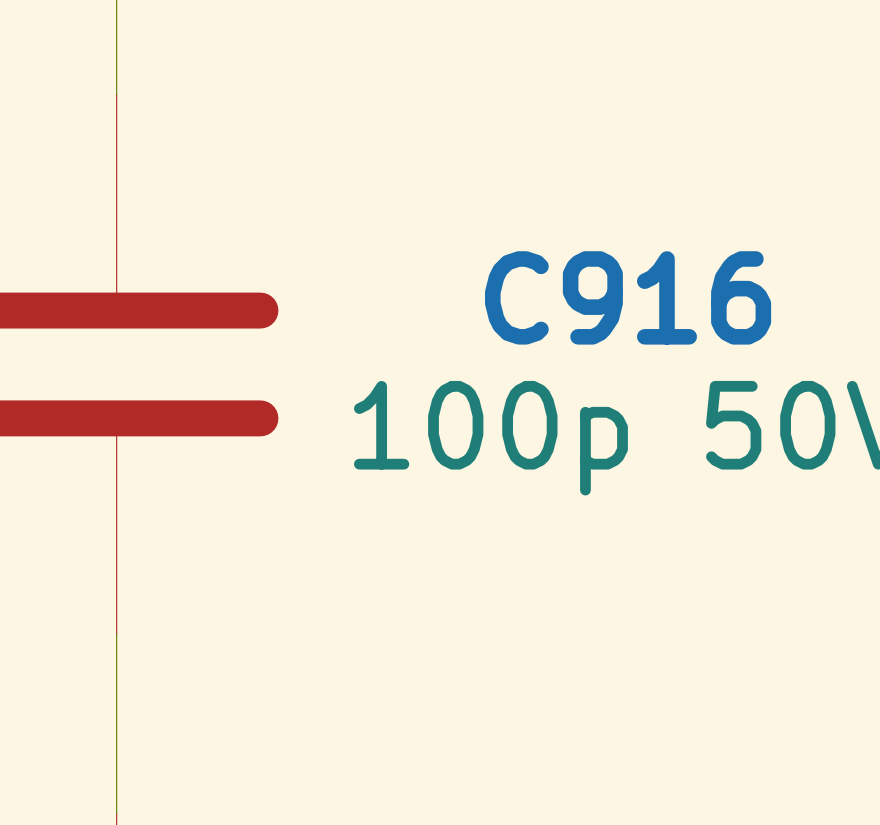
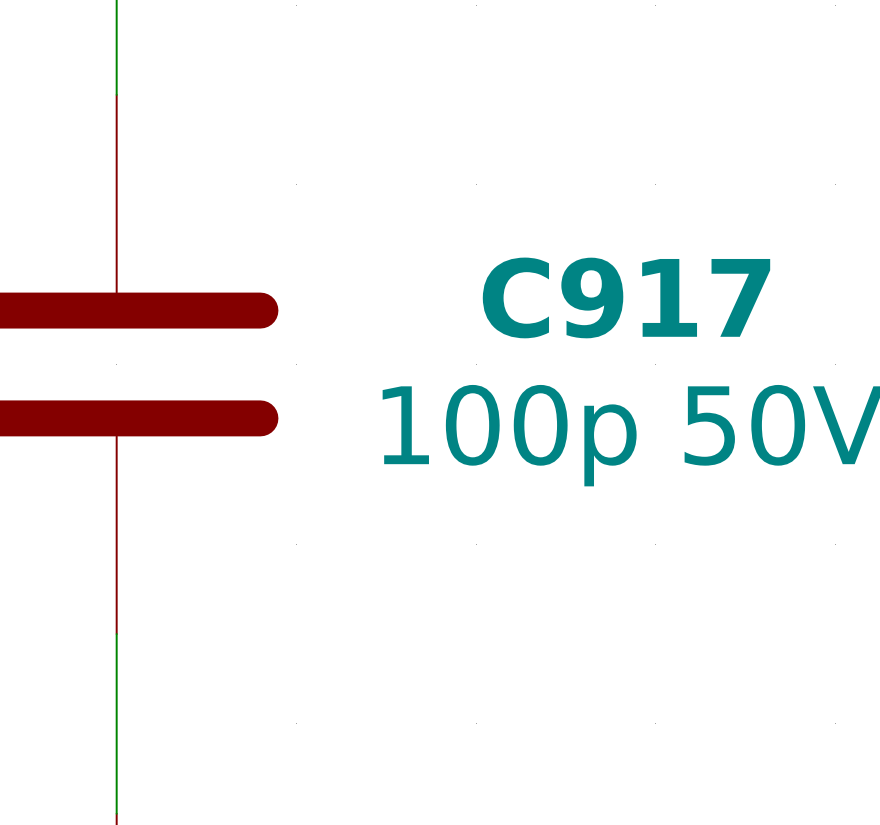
C916 name: C916 (628, 297) -> C917 (626, 297)

